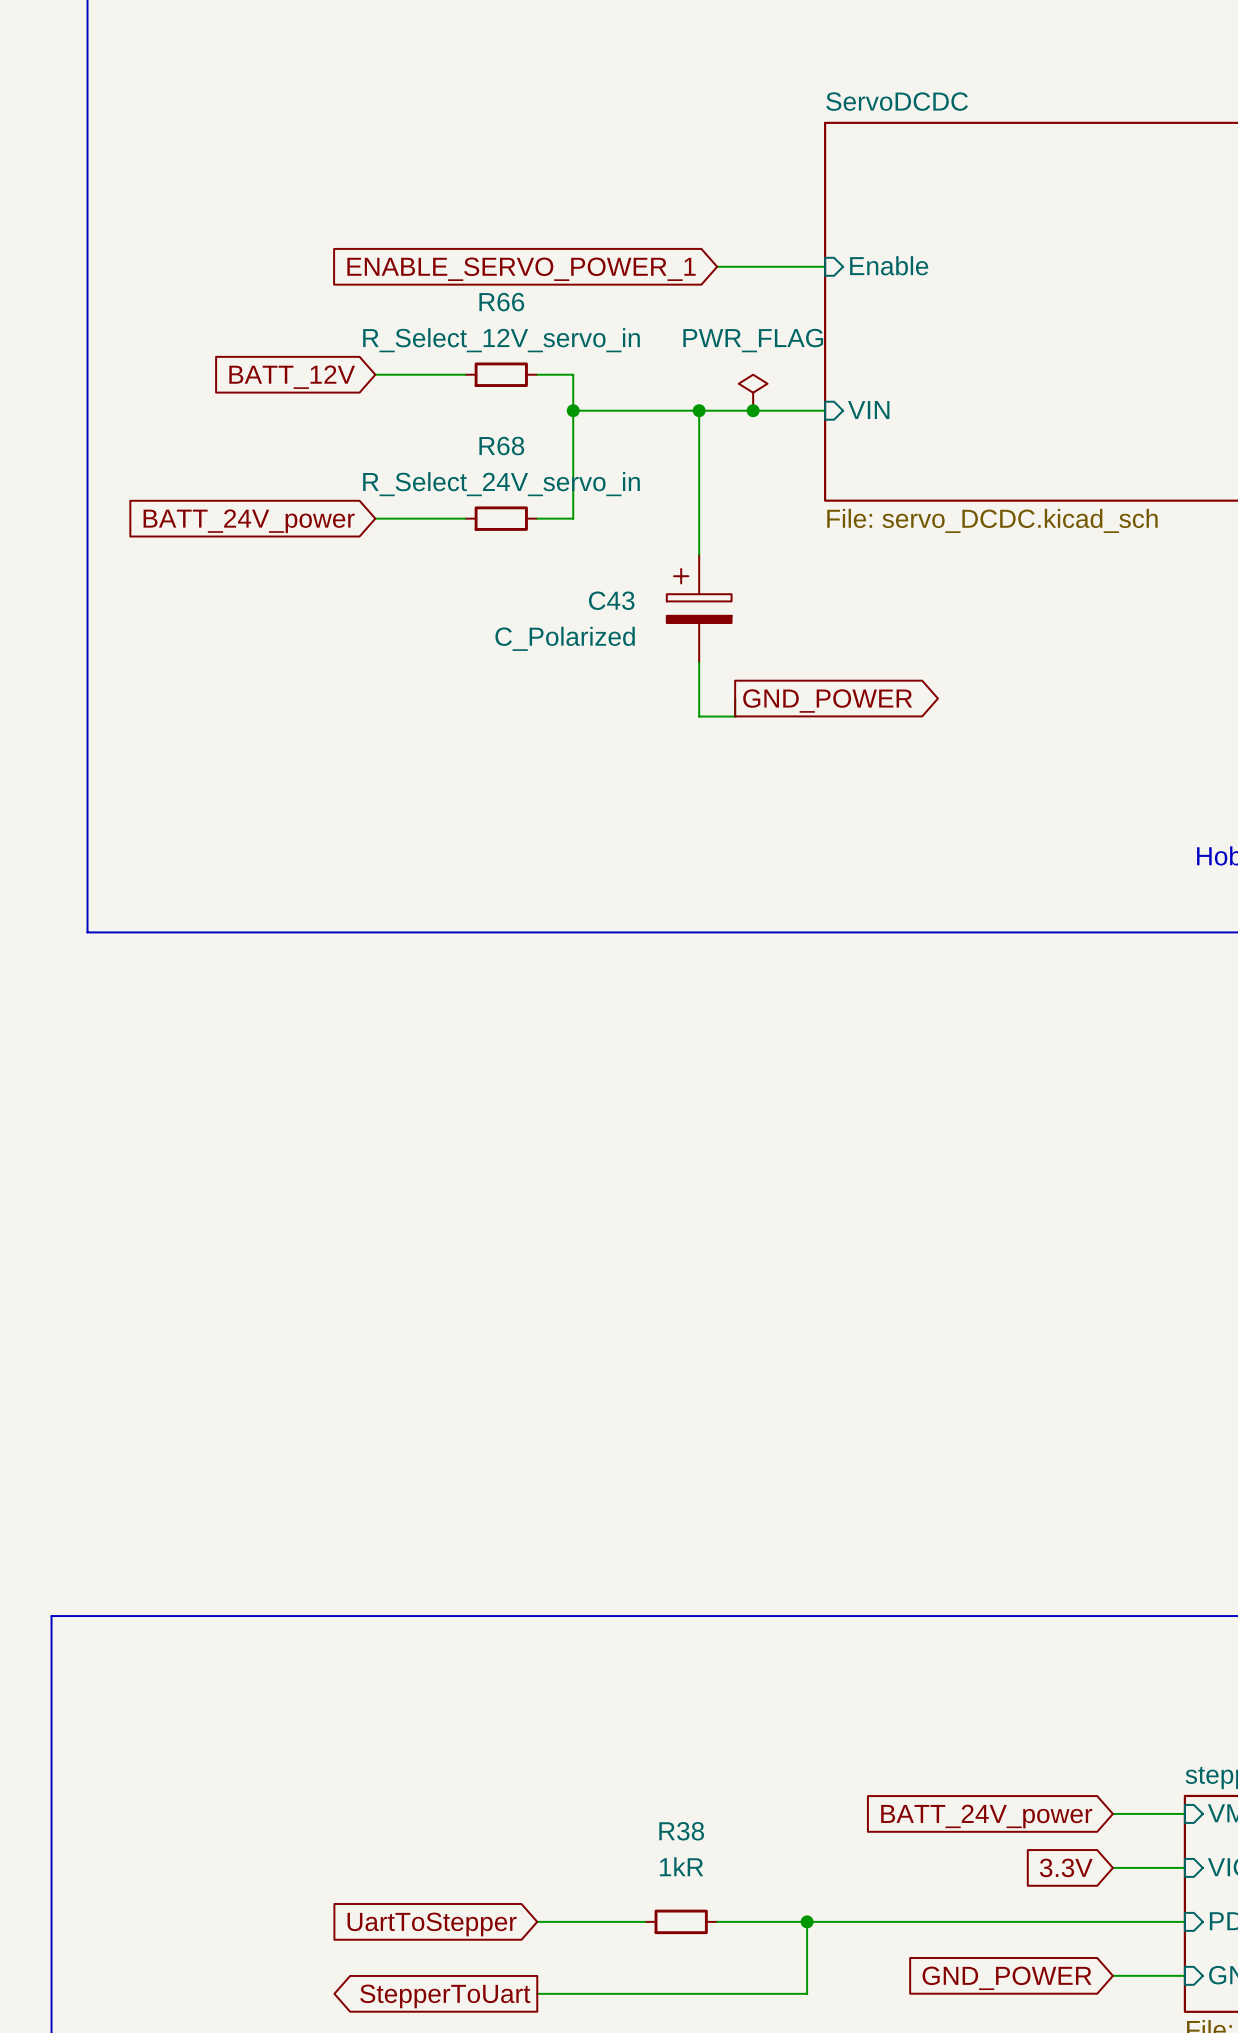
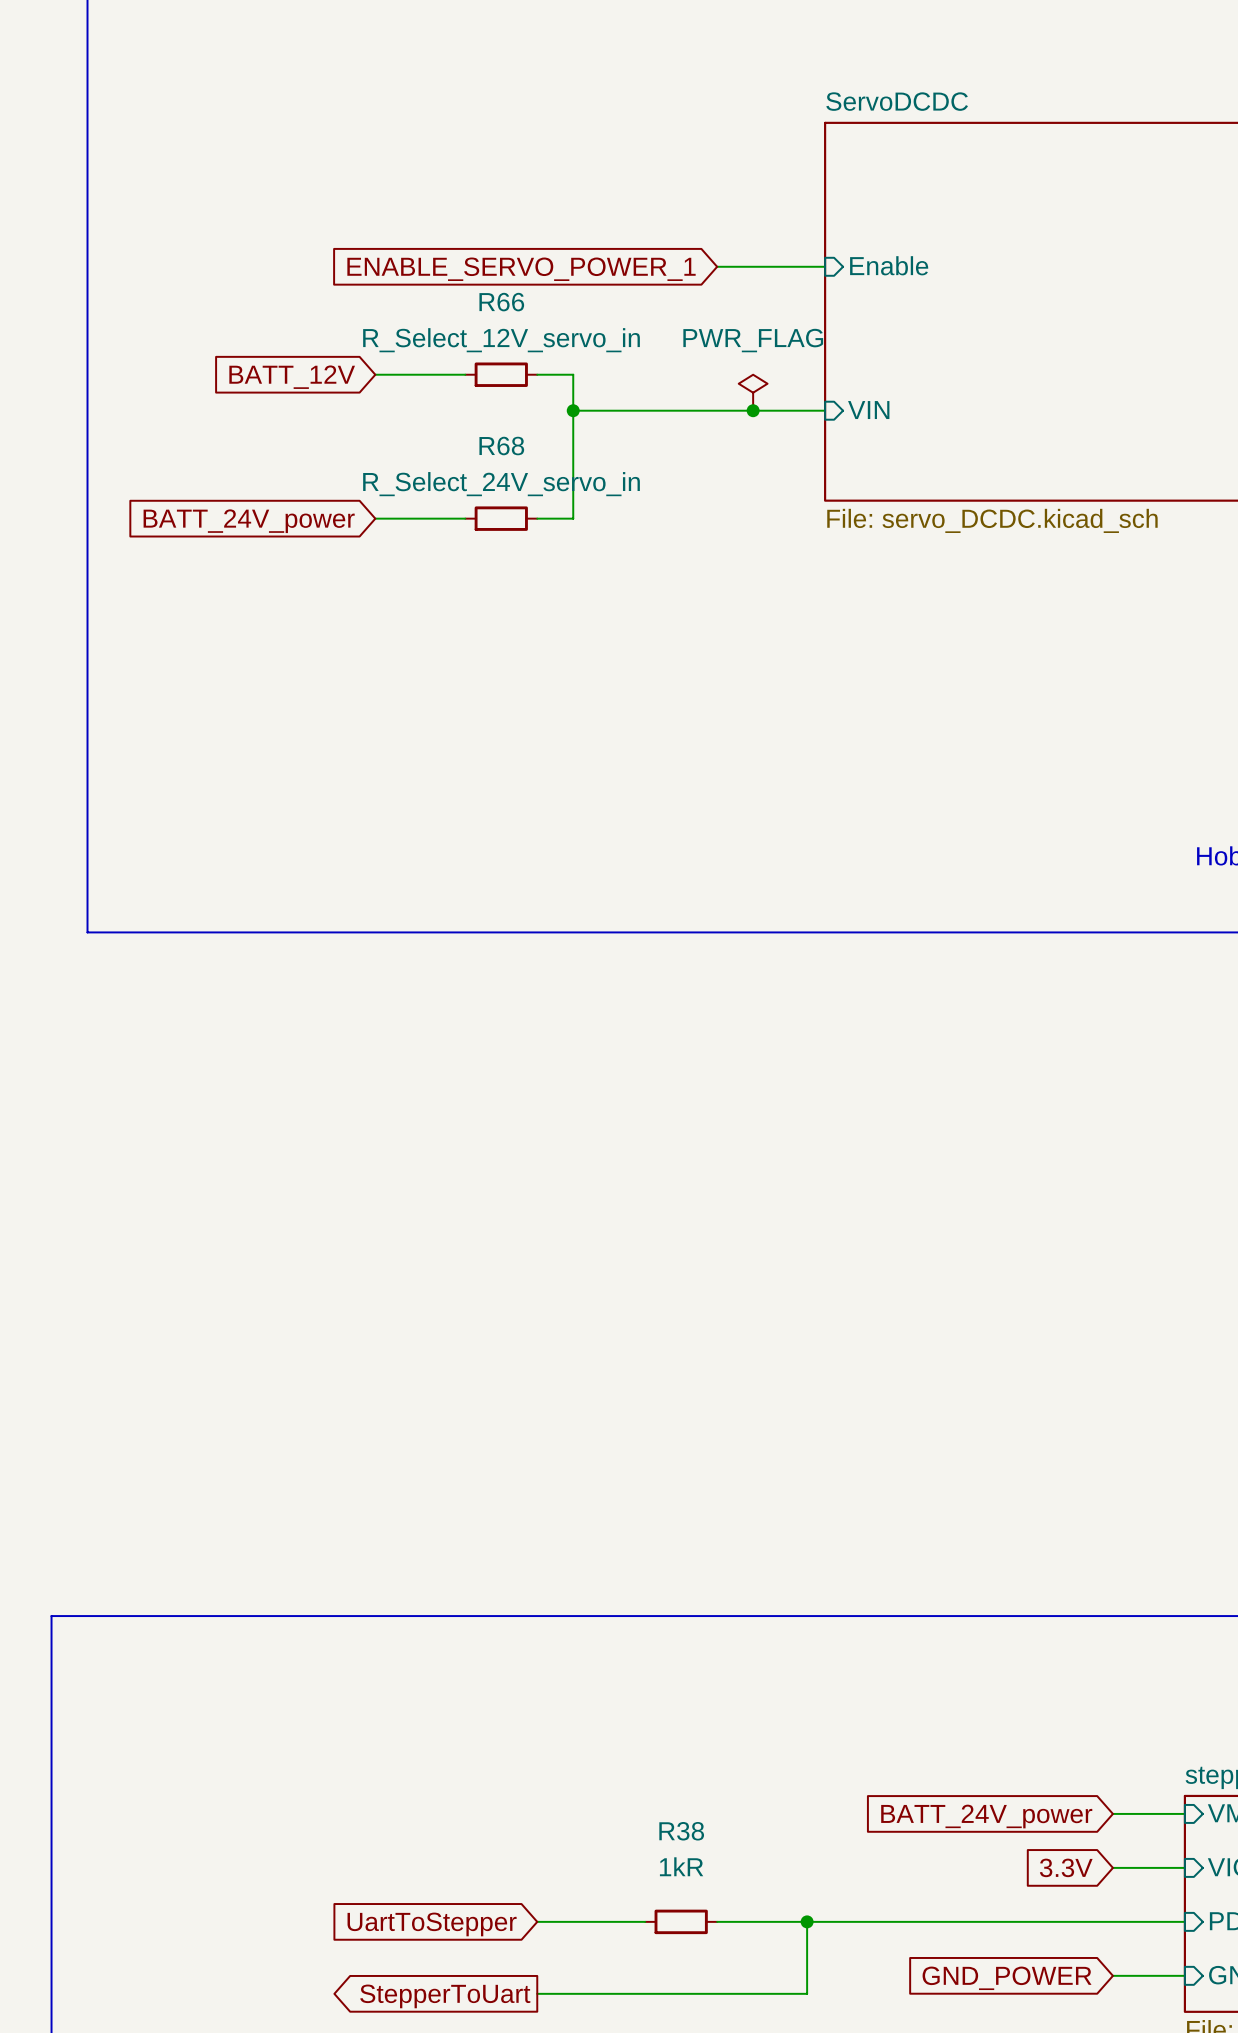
wire: (699, 410) (699, 554) -> none
junction: (699, 410) -> none
C43: C_Polarized (699, 608) -> none
wire: (699, 662) (699, 716) (735, 716) (735, 698) -> none
global label: GND_POWER (827, 701) -> none

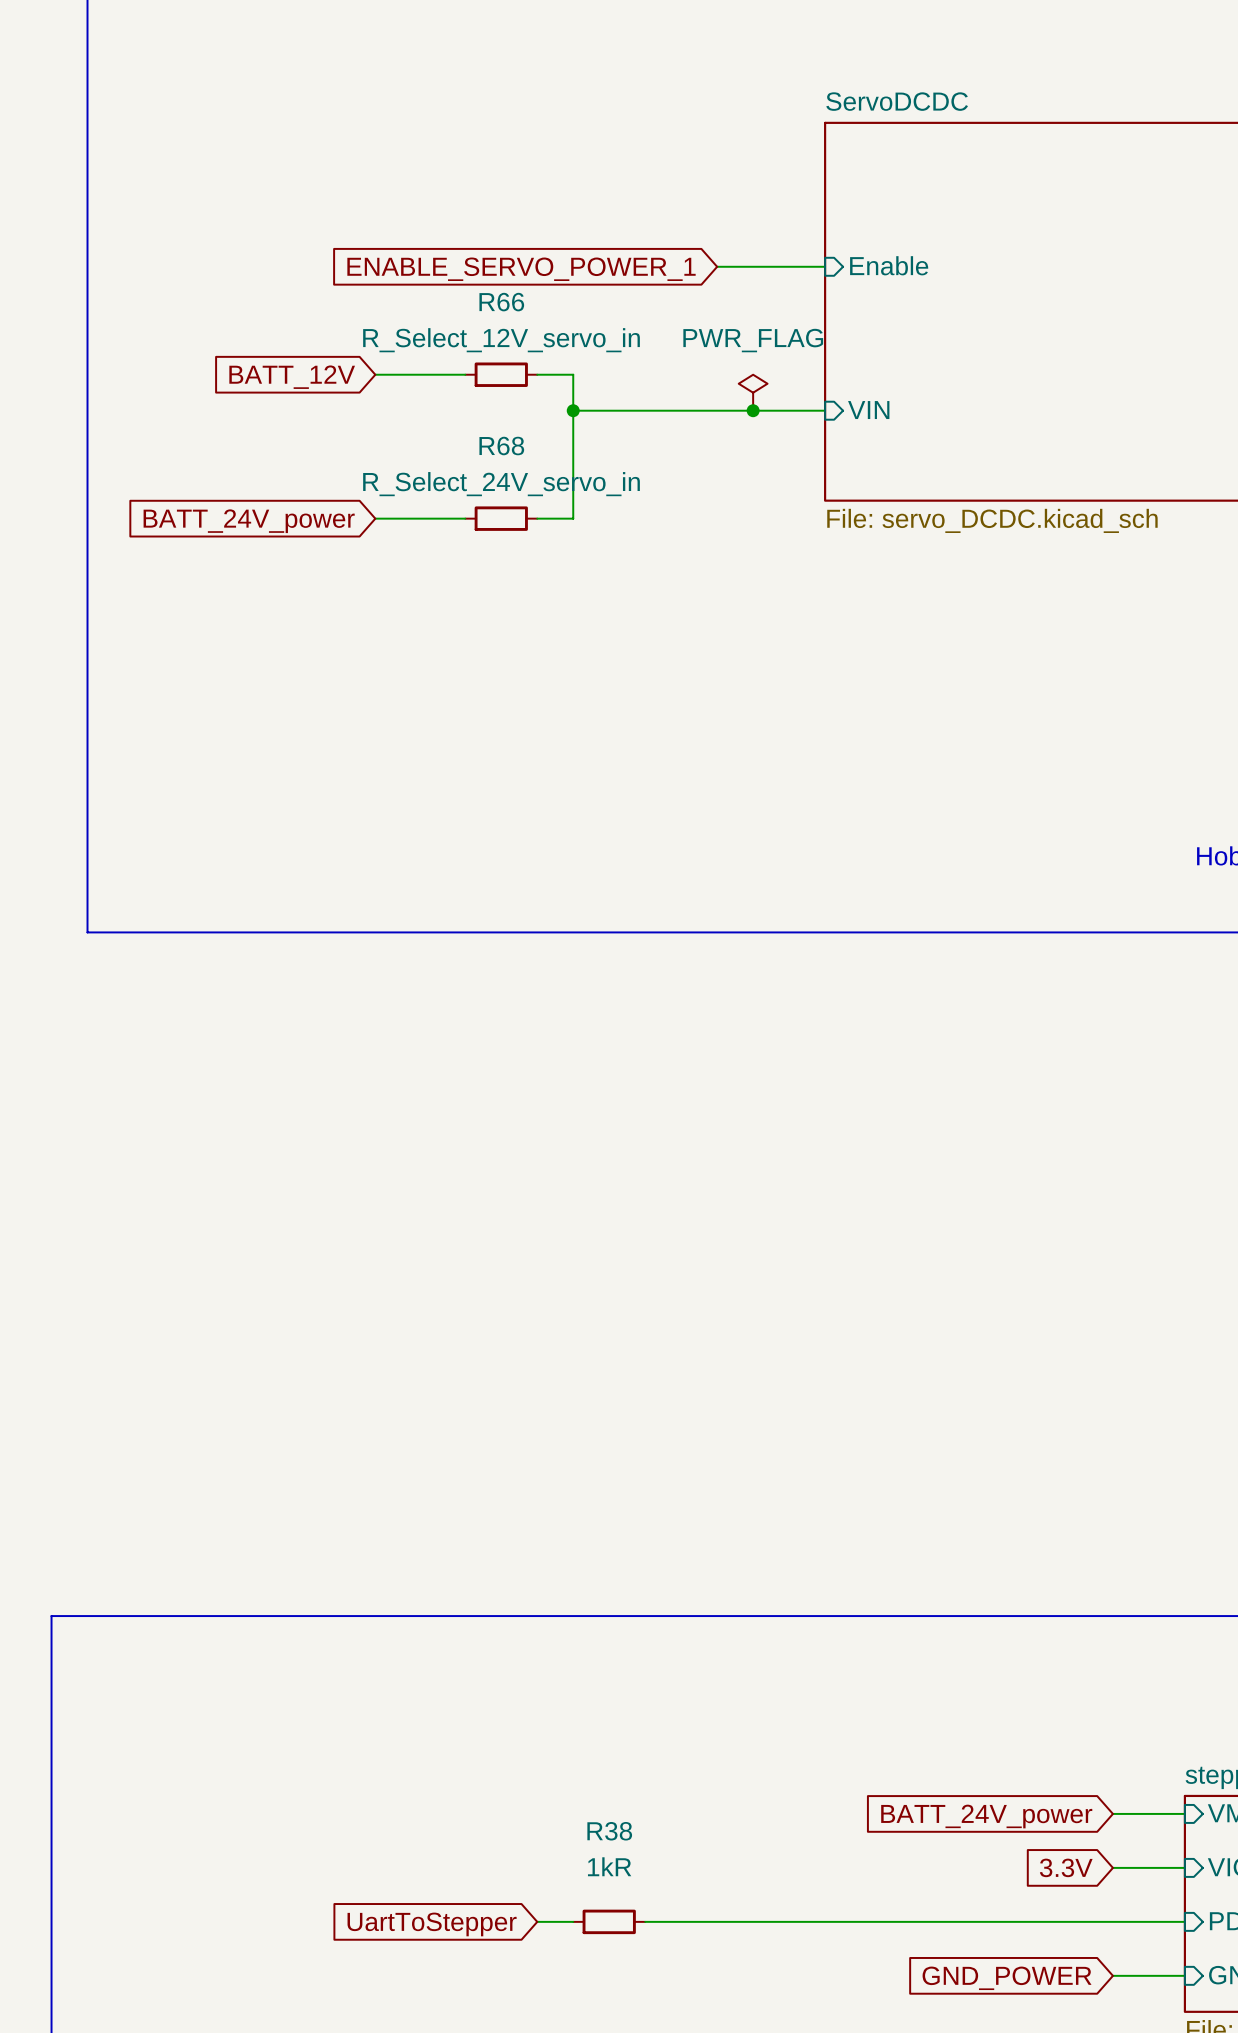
wire: (573, 1921) (645, 1921) -> (717, 1921) (645, 1921)
R38 position: (681, 1921) -> (609, 1921)
wire: (807, 1921) (807, 1993) (537, 1993) -> none
junction: (807, 1921) -> none
global label: StepperToUart (445, 1996) -> none

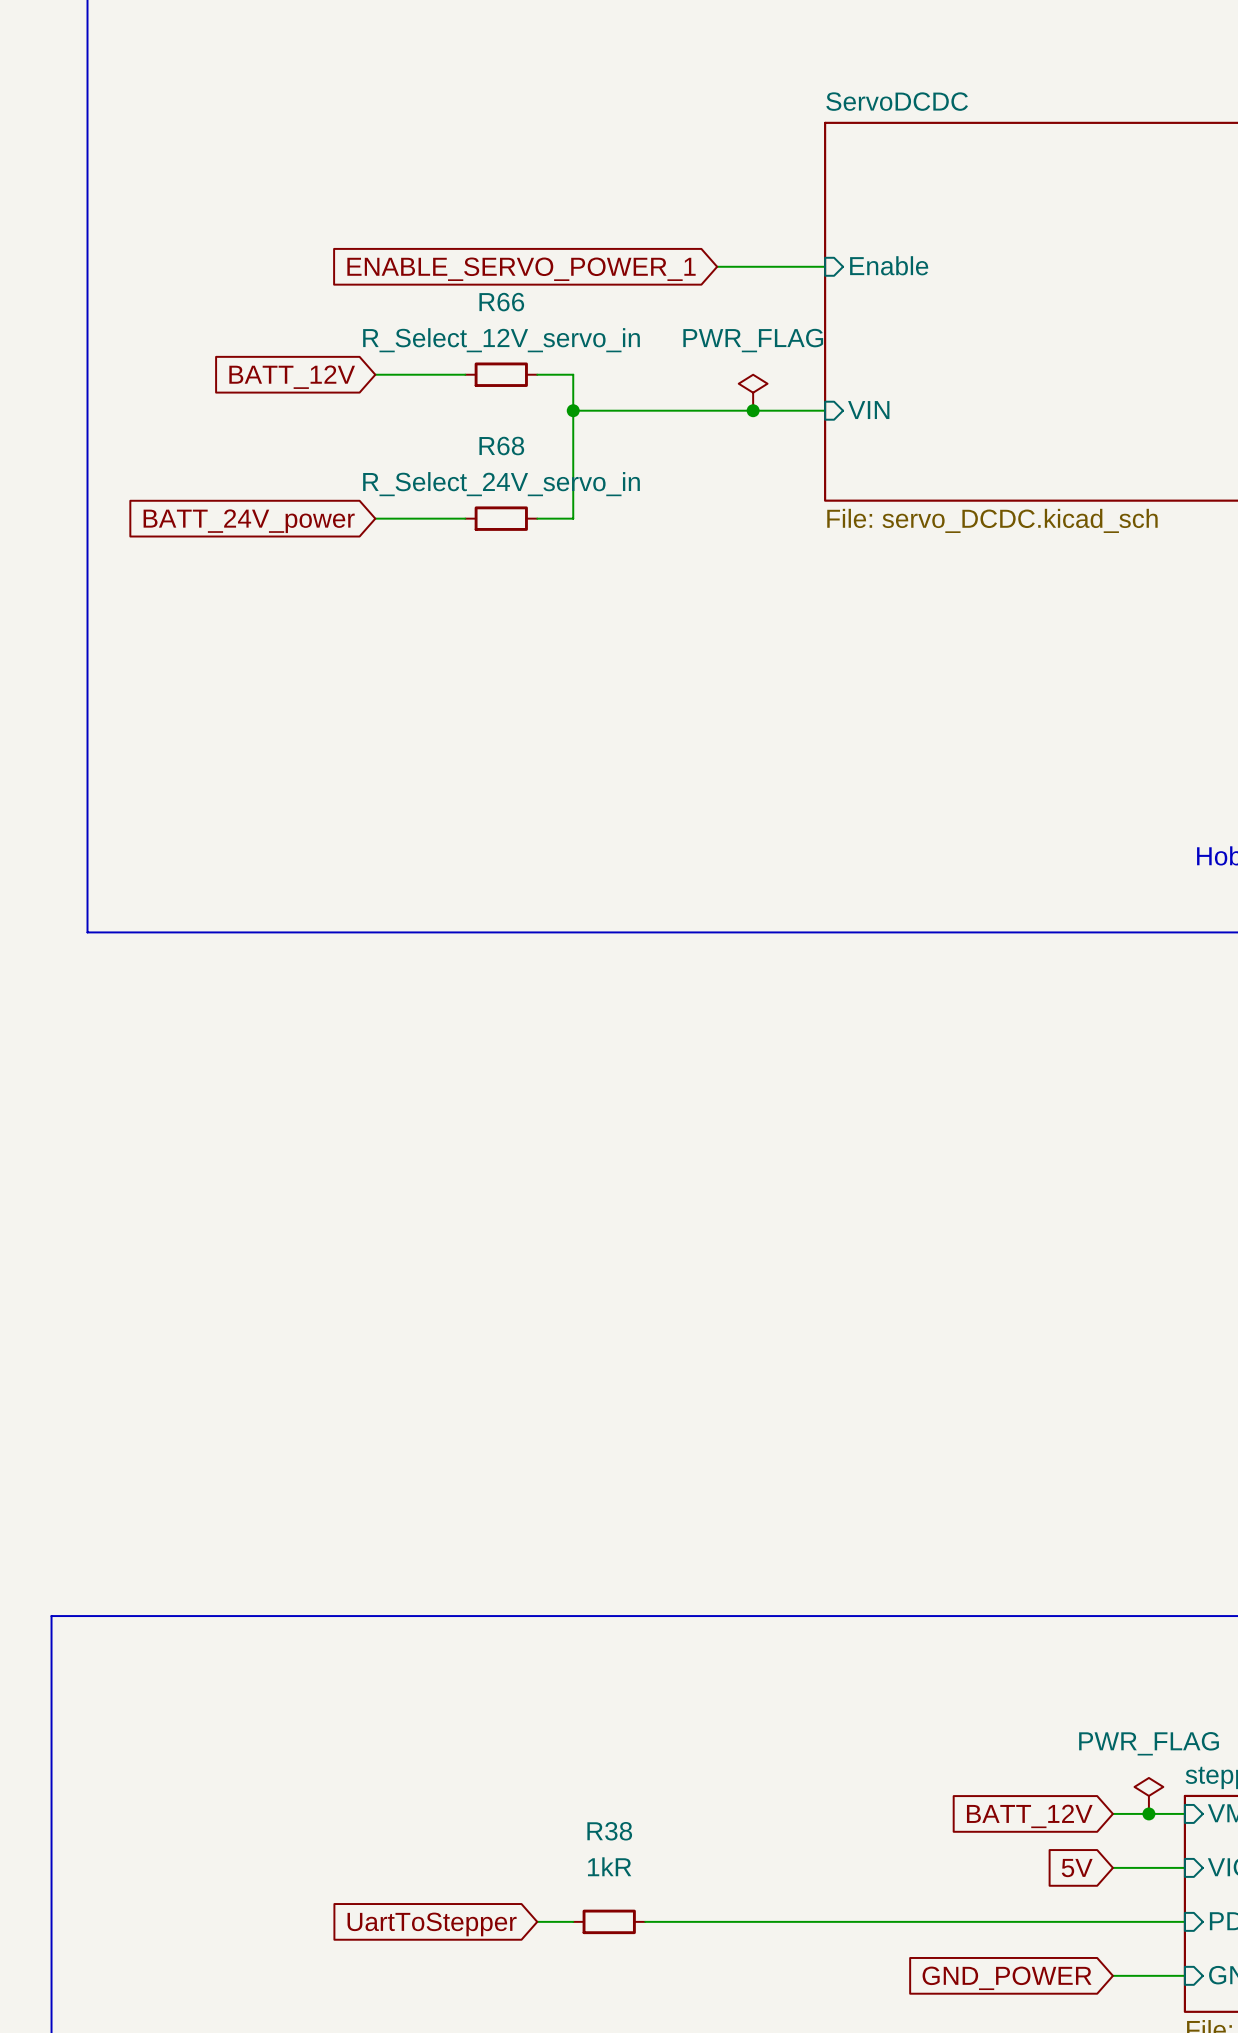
power symbol: none -> PWR_FLAG (1148, 1795)
junction: none -> (1148, 1813)
global label: BATT_24V_power (986, 1816) -> BATT_12V (1029, 1816)
global label: 3.3V (1066, 1867) -> 5V (1077, 1868)

